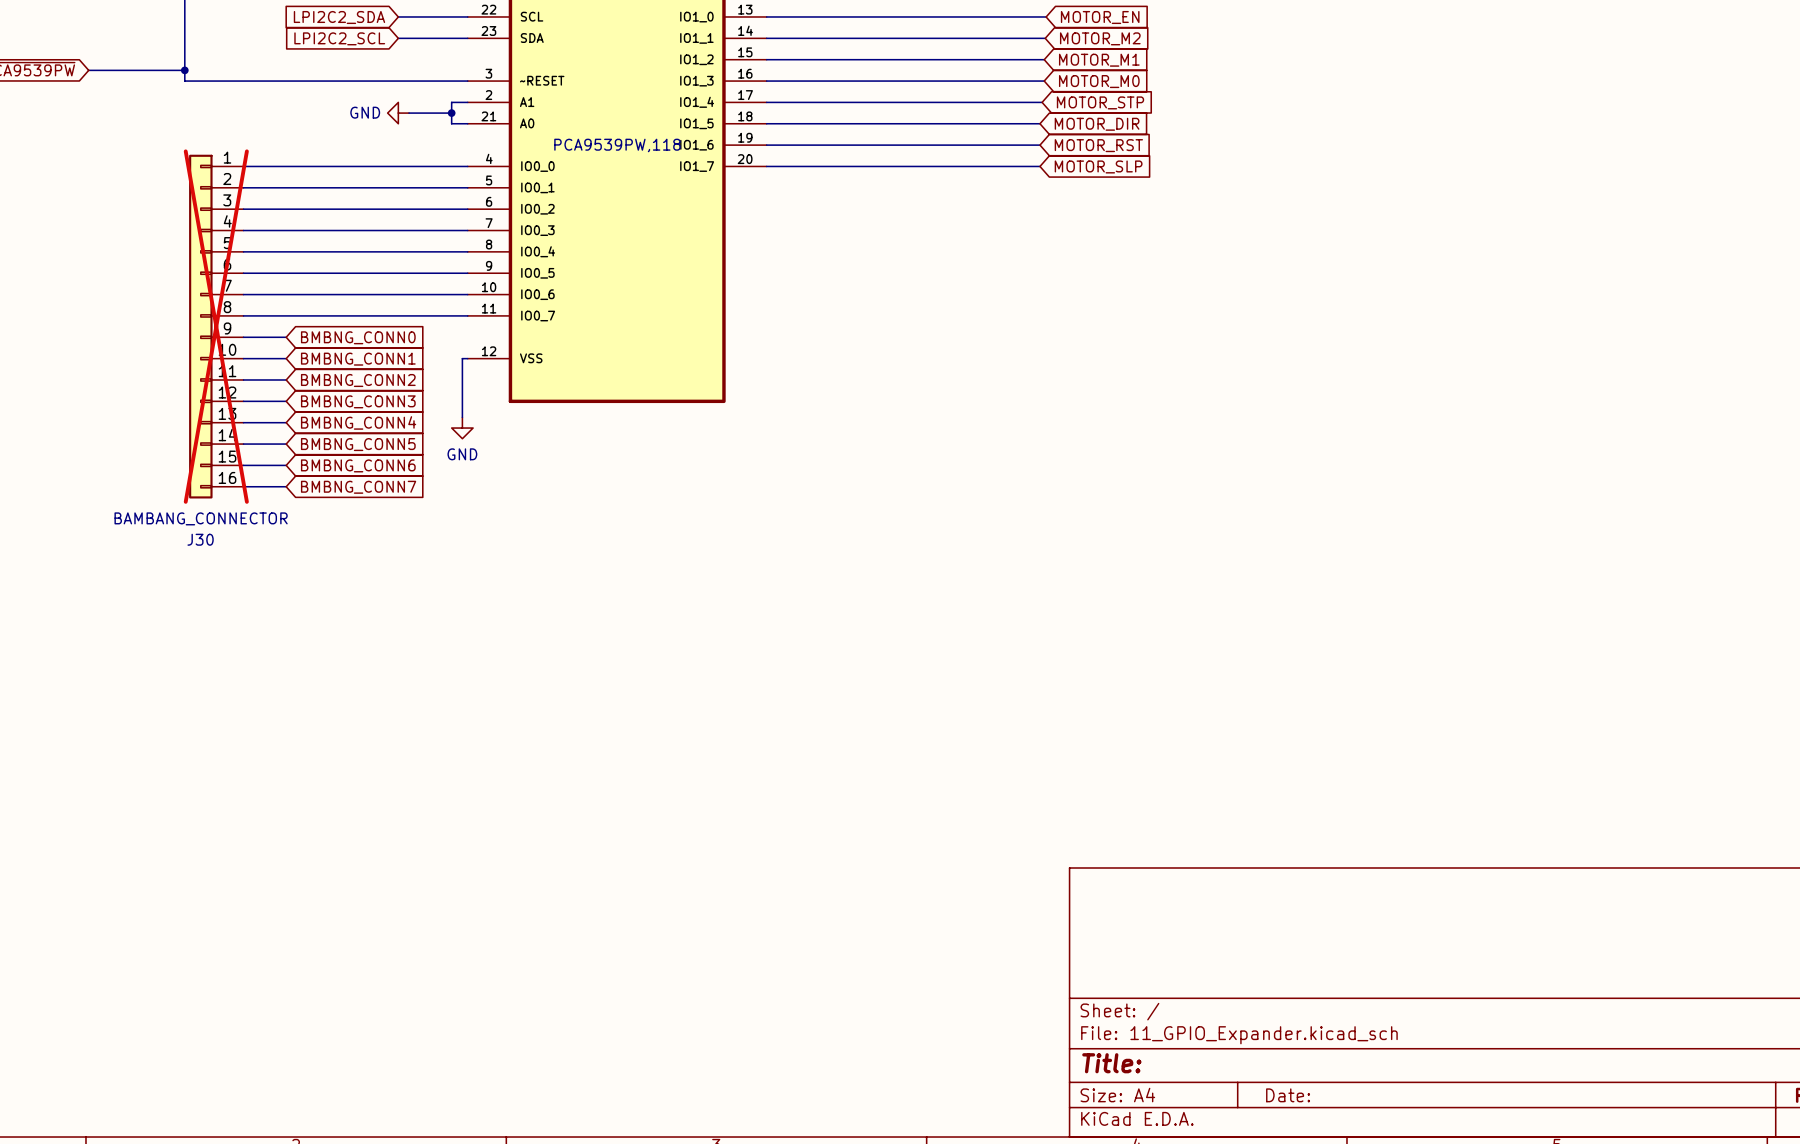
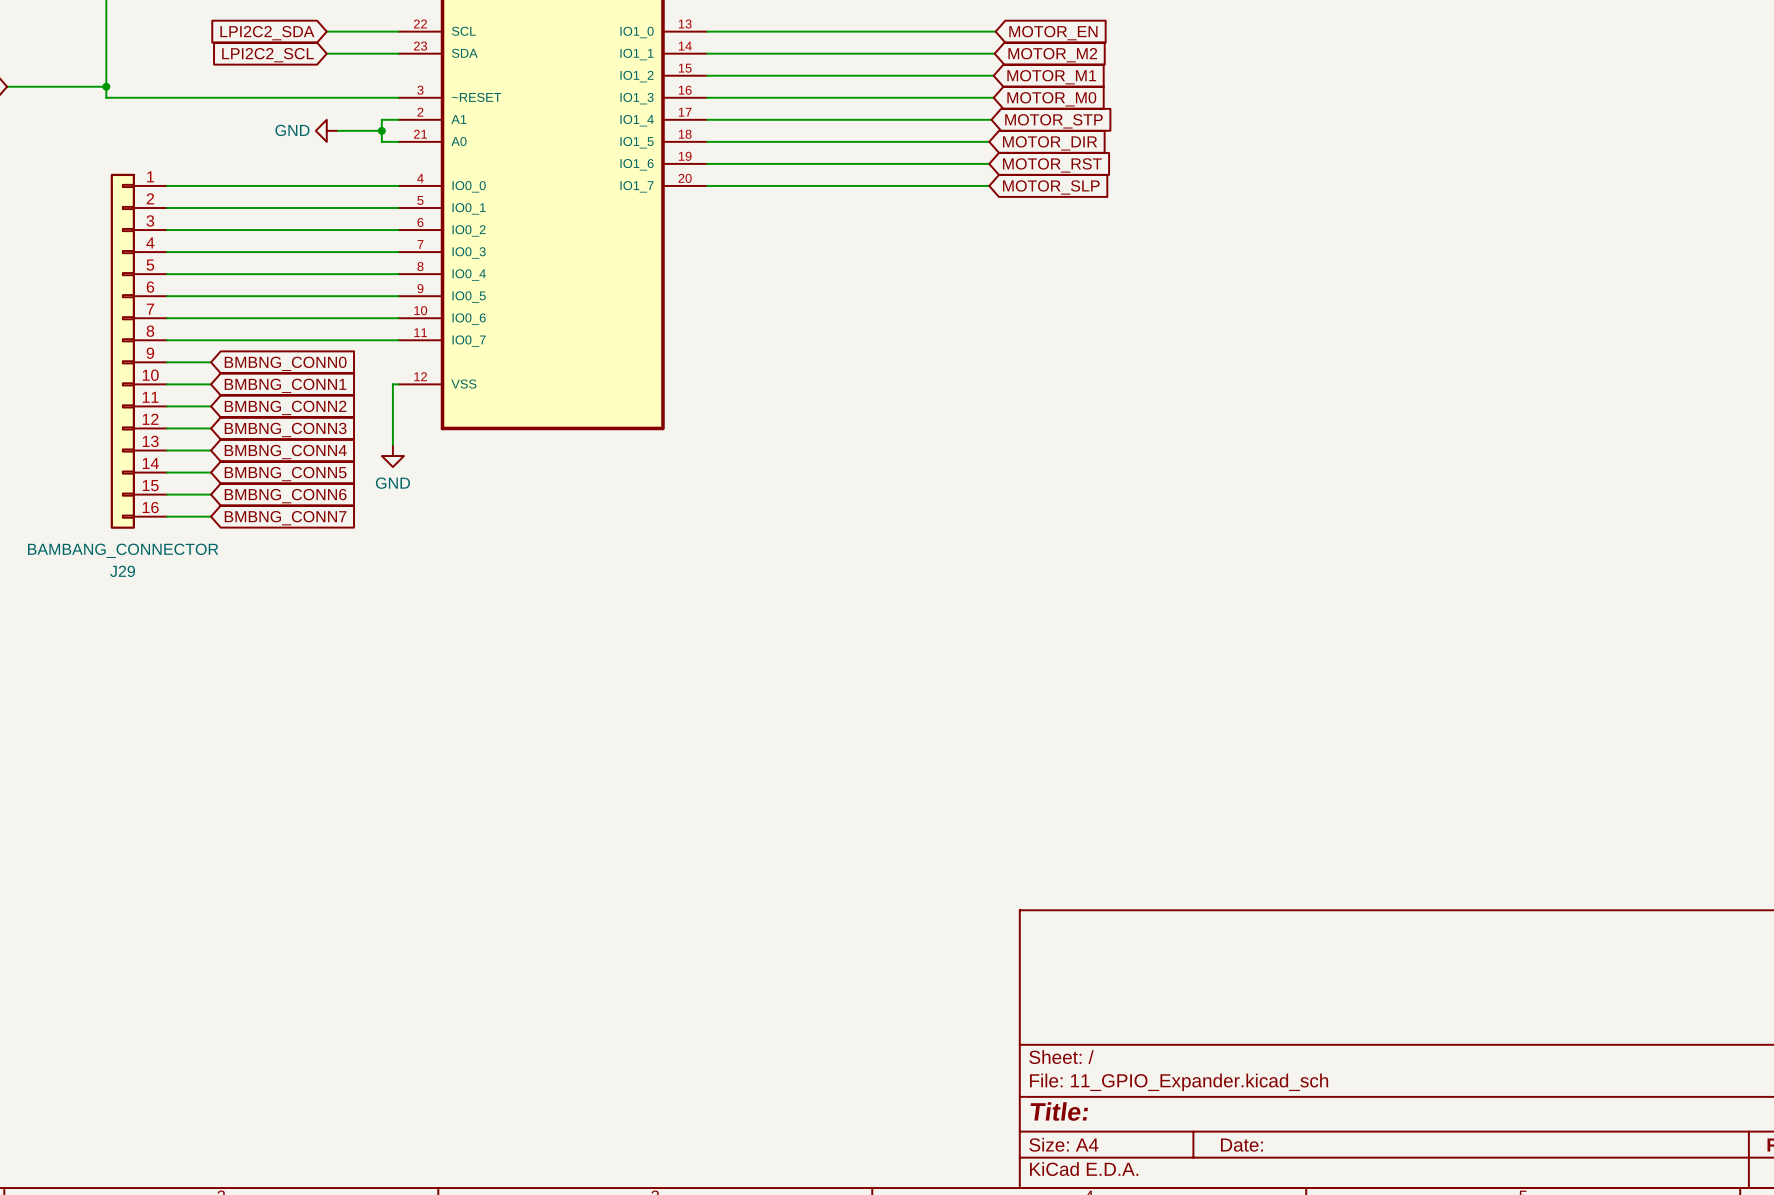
part text: PCA9539PW,118 (617, 145) -> none
J30 do-not-place cross: (216, 326) -> none
J30 name: J30 (200, 539) -> J29 (122, 571)

